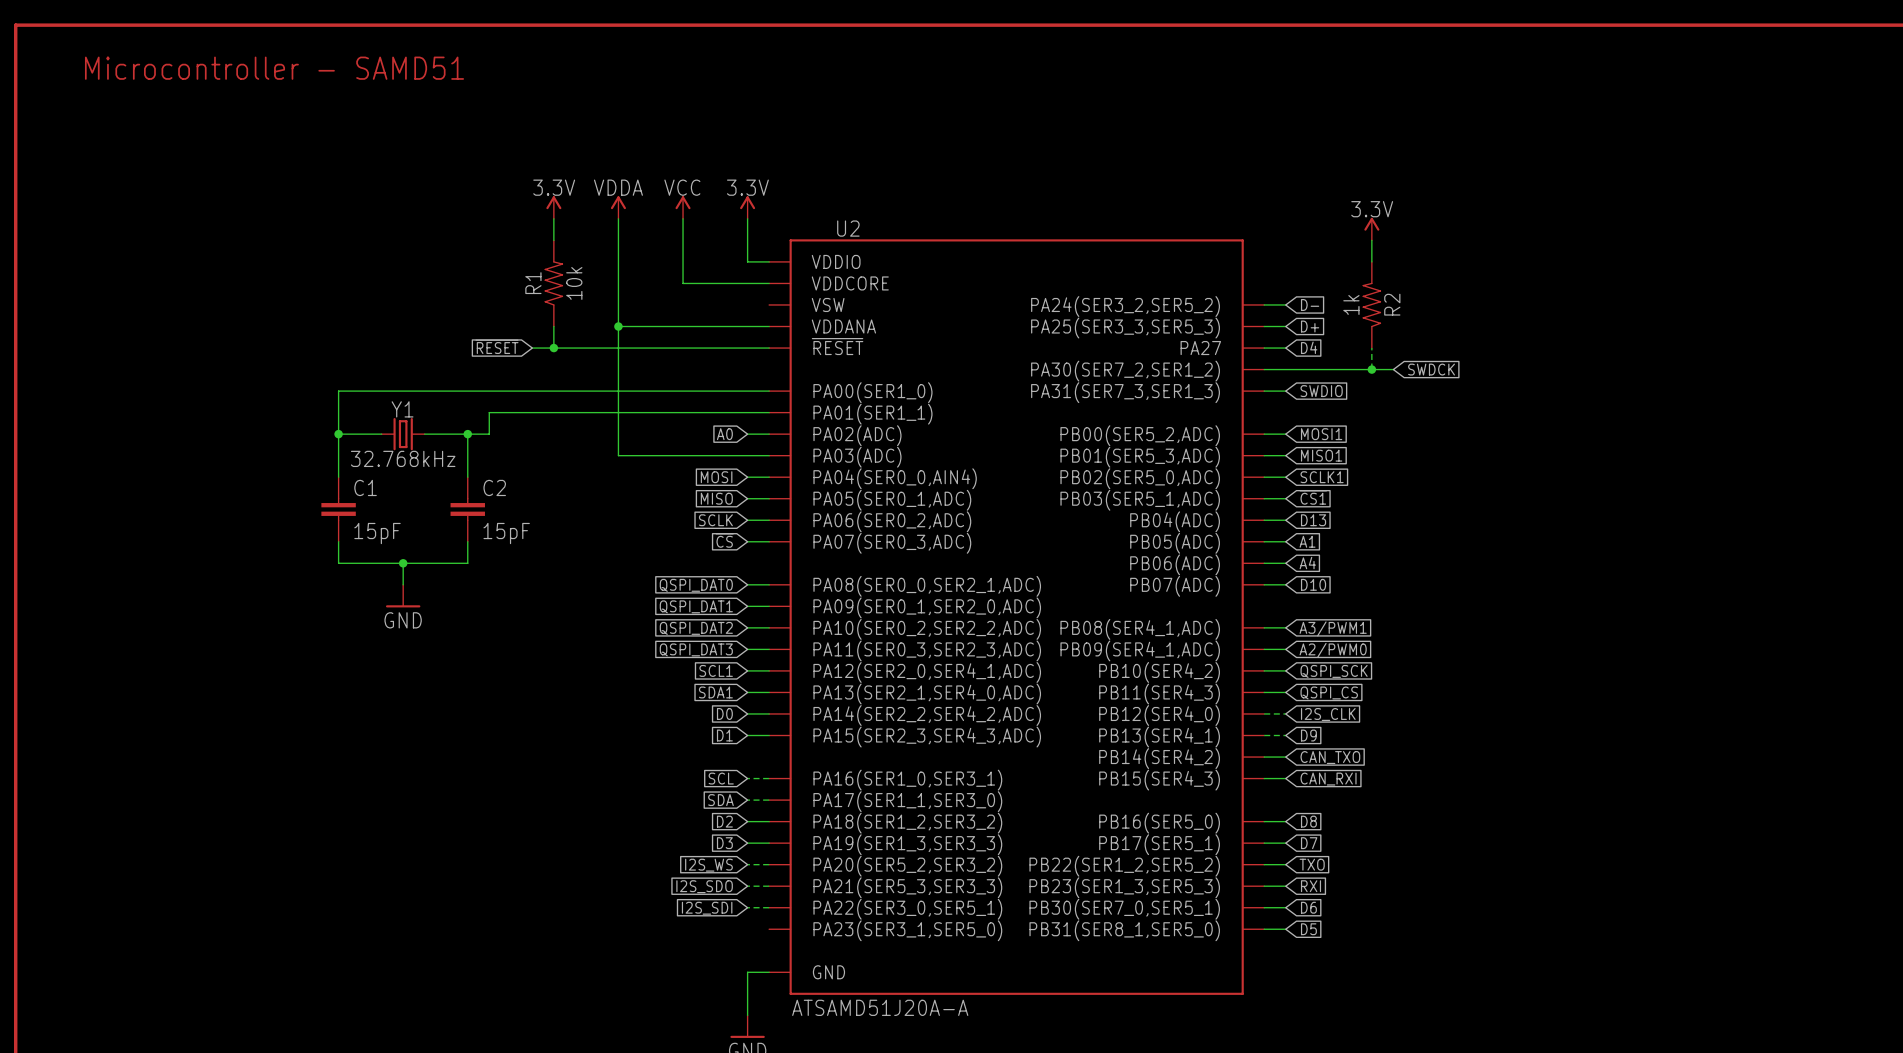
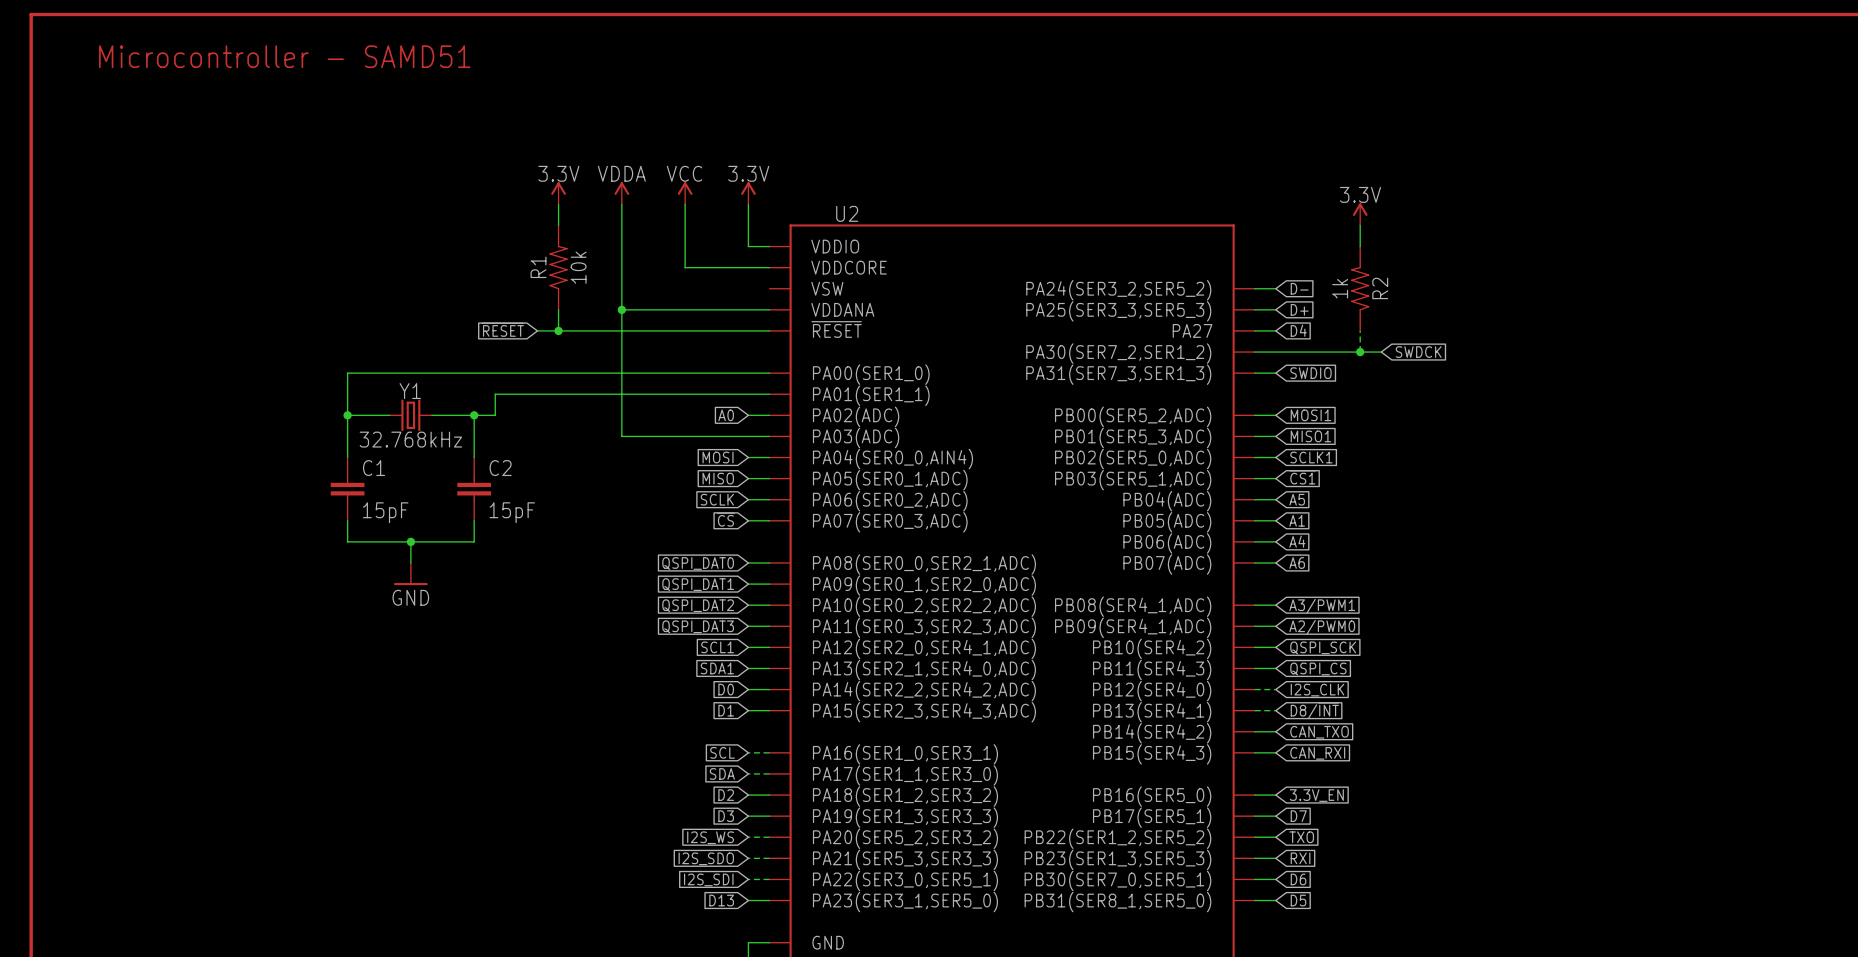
global label: D13 (1313, 520) -> A5 (1297, 499)
global label: D10 (1313, 584) -> A6 (1297, 563)
global label: D9 (1308, 735) -> D8/~{INT} (1314, 710)
global label: D8 (1308, 821) -> 3.3V_EN (1316, 795)
global label: none -> D13 (721, 900)
wire: none -> (748, 900) (769, 900)

